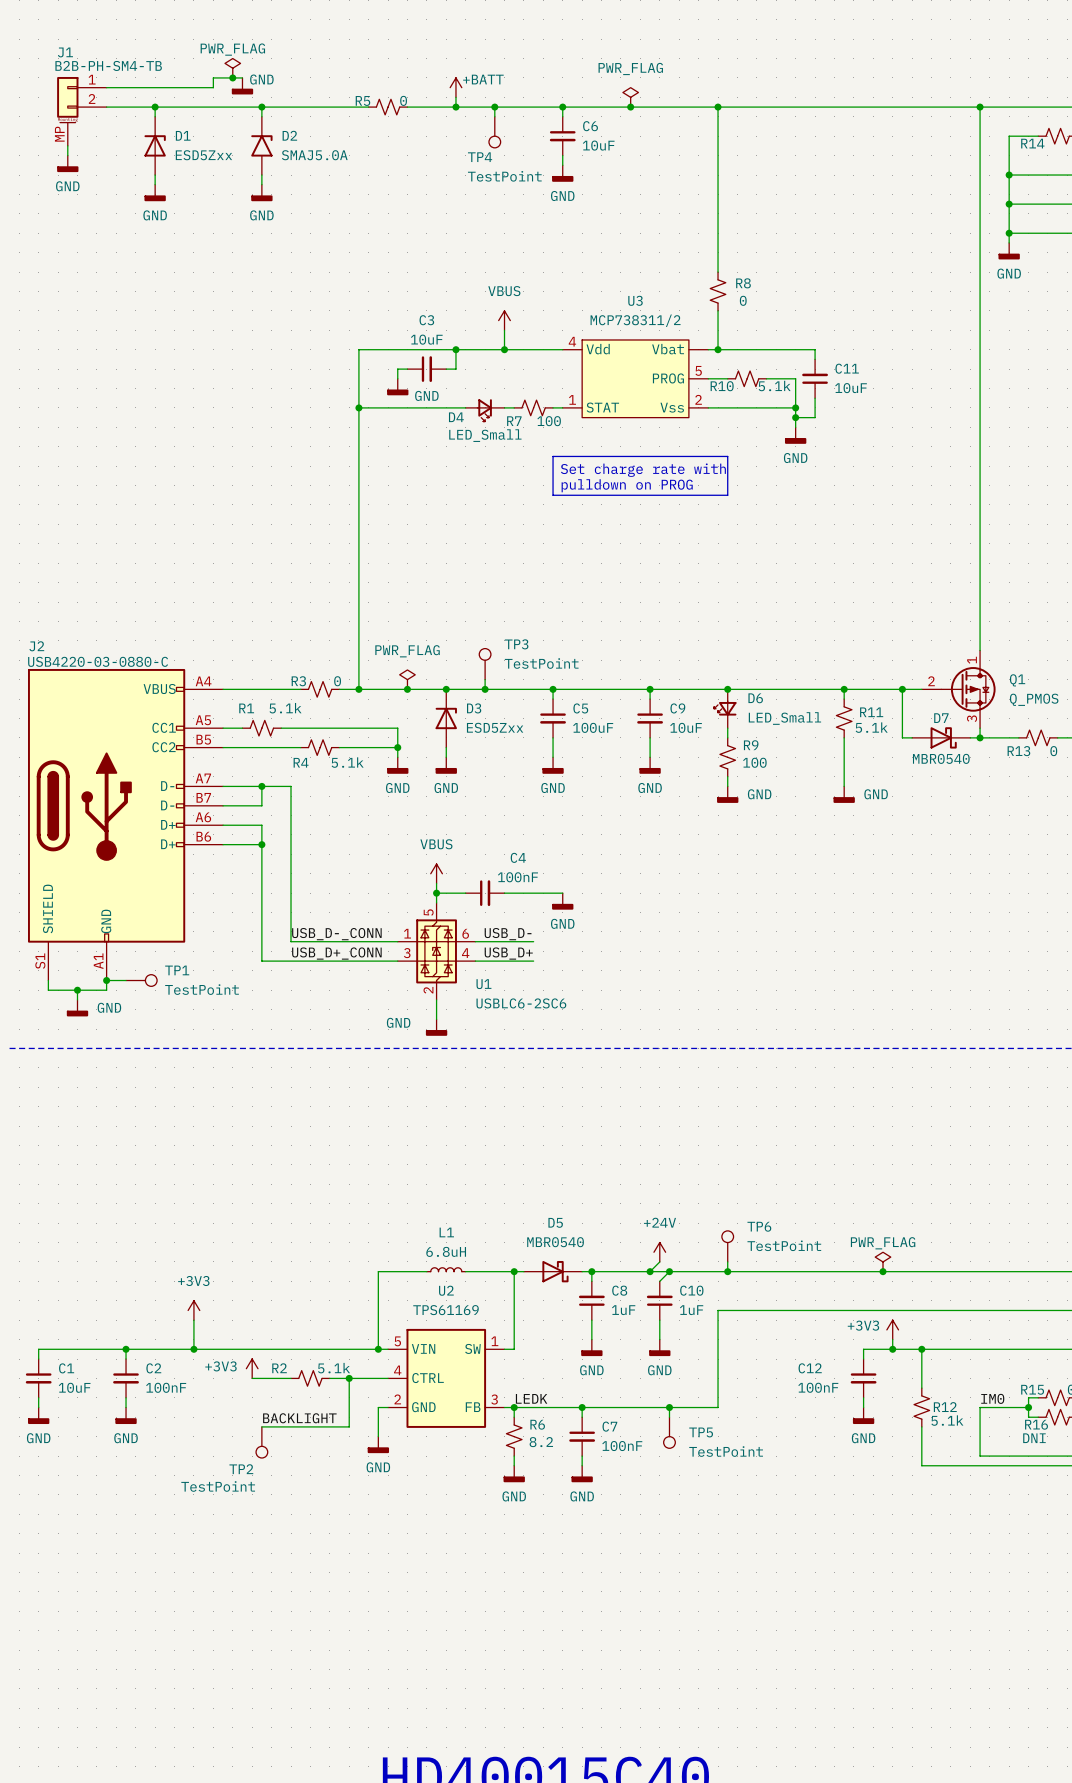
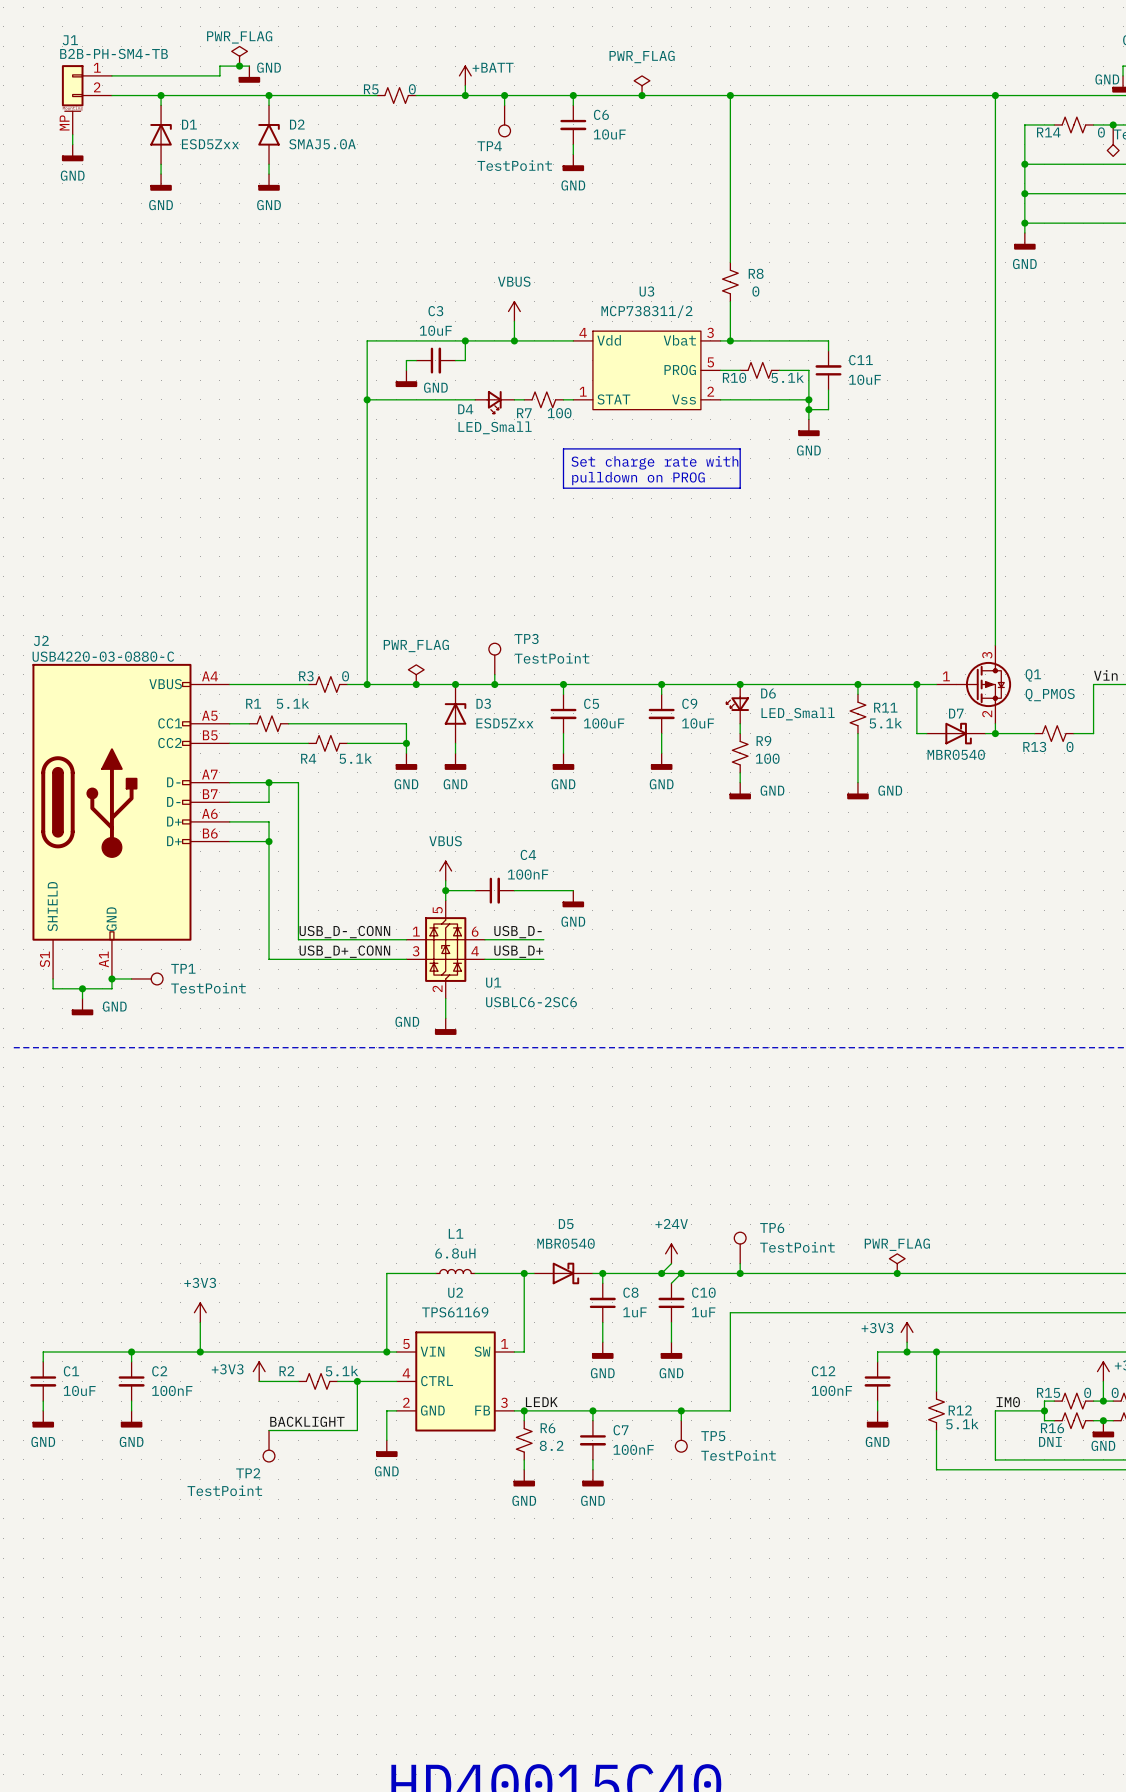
U3 pin number: none -> 3 (710, 332)
Q1 pin number: 1 (972, 660) -> 3 (987, 655)
Q1 pin number: 2 (931, 681) -> 1 (946, 676)
Q1 pin number: 3 (972, 718) -> 2 (987, 713)

